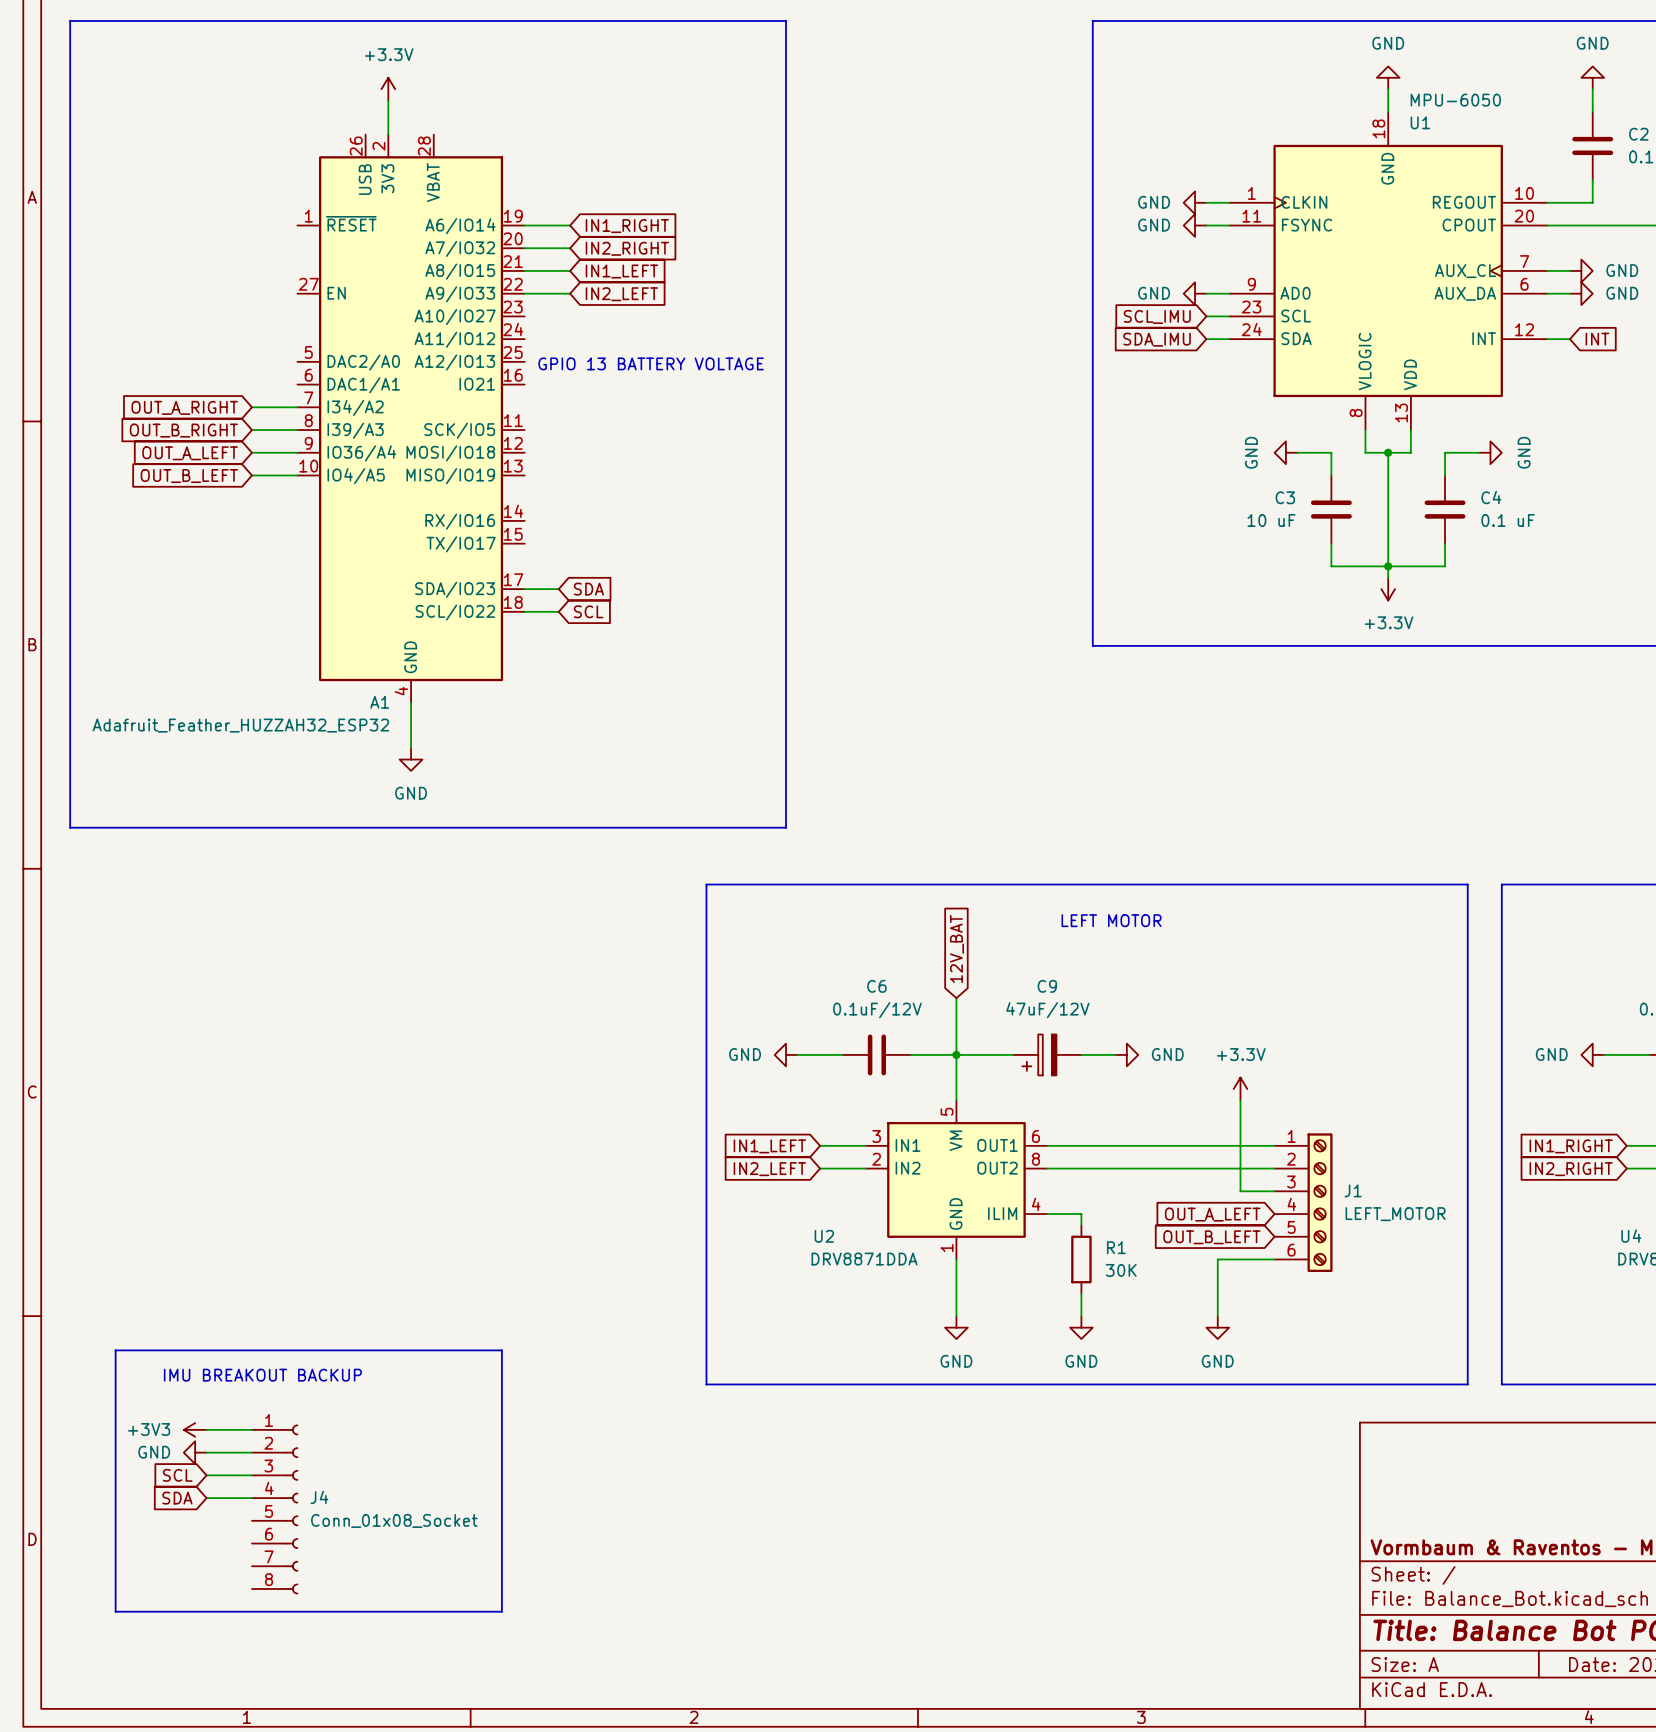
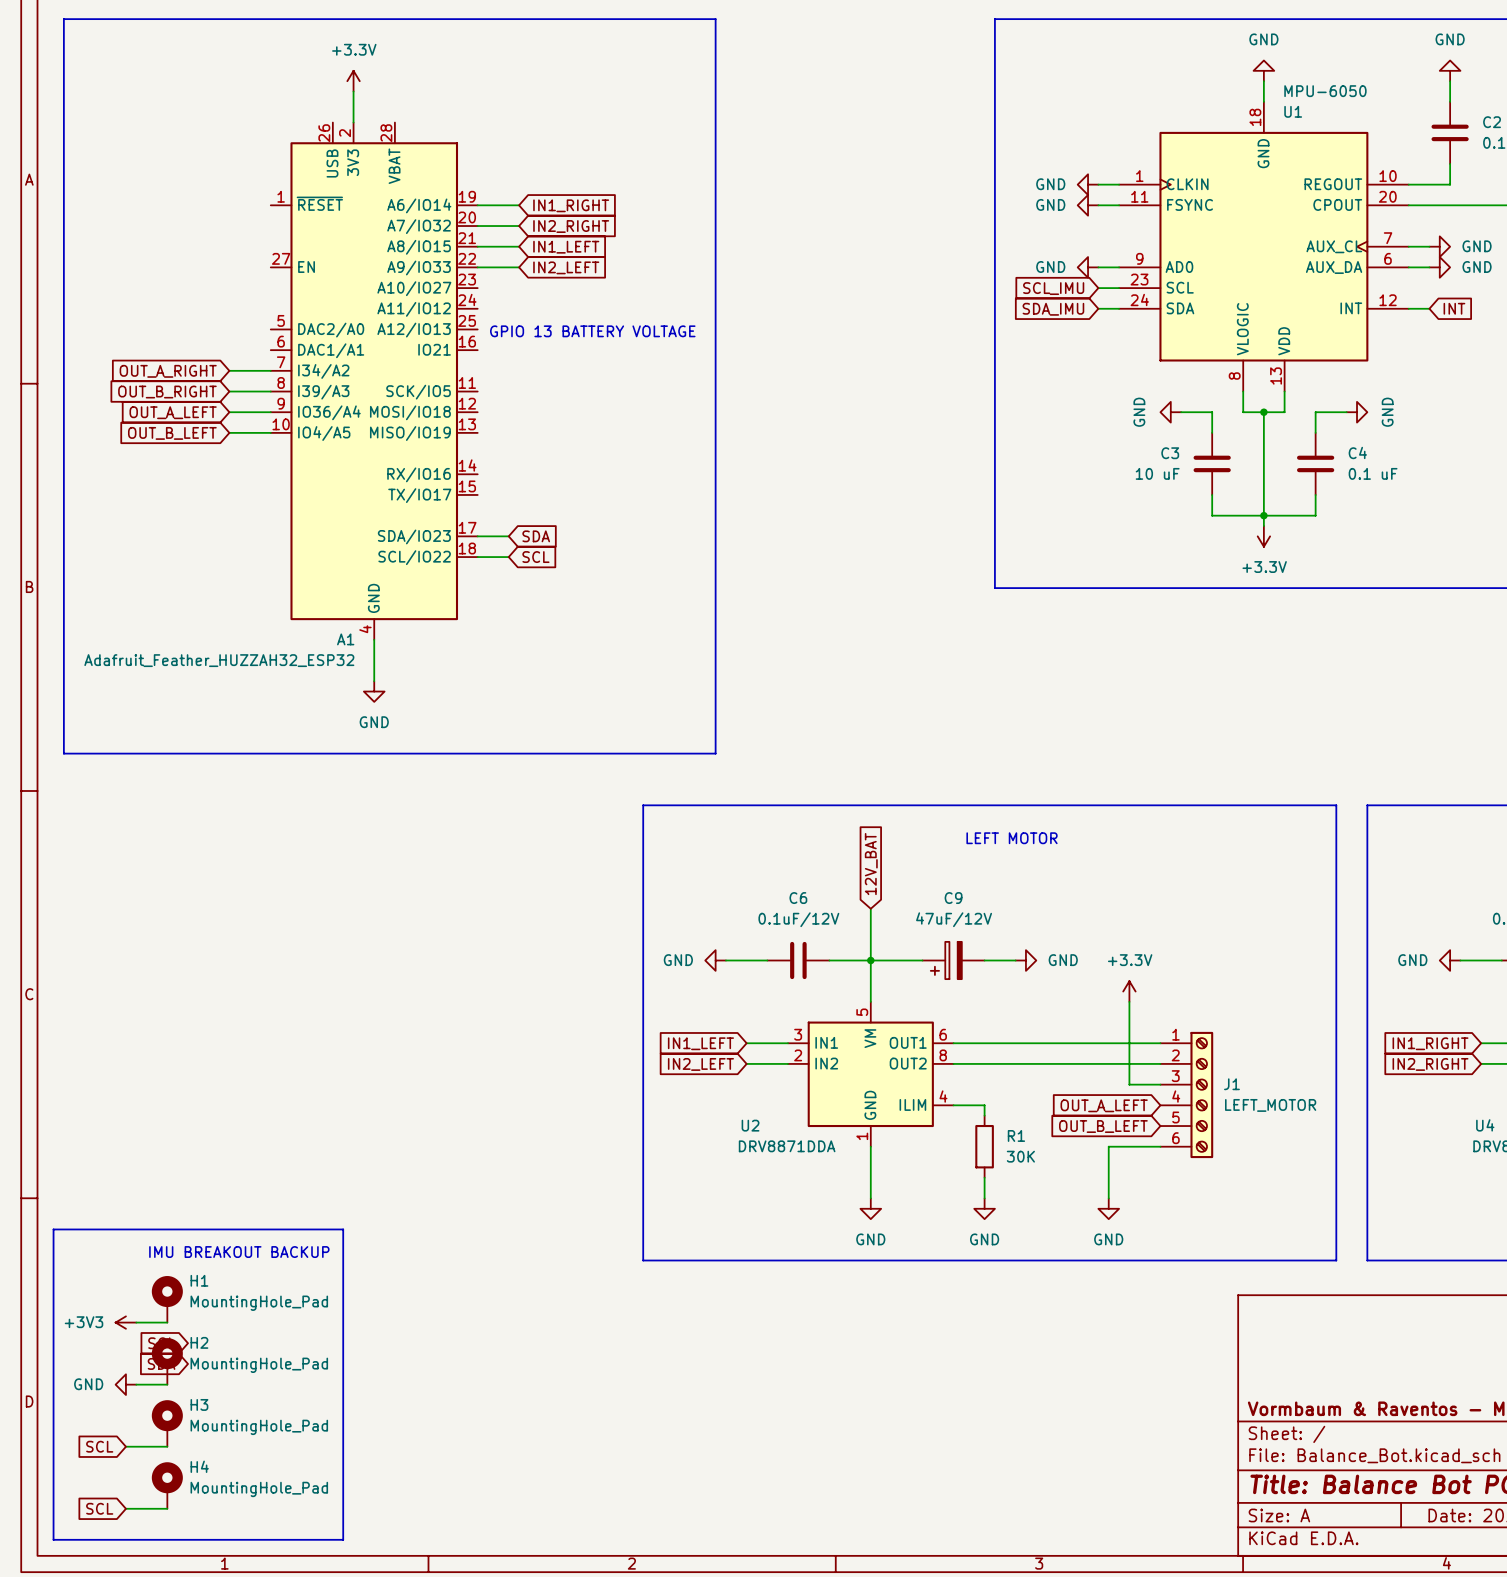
line: (115, 1350) (115, 1611) (501, 1611) (501, 1350) (376, 1350) -> (105, 1229) (53, 1229) (53, 1539) (343, 1539) (343, 1229)
H1: none -> MountingHole_Pad (167, 1299)
power symbol position: +3V3 (195, 1429) -> +3V3 (125, 1322)
wire: (206, 1429) (251, 1429) -> (125, 1446) (167, 1446)
wire: none -> (136, 1322) (167, 1322)
power symbol position: GND (195, 1452) -> GND (125, 1384)
wire: (206, 1452) (251, 1452) -> none
wire: (206, 1475) (251, 1475) -> none
H2: none -> MountingHole_Pad (167, 1361)
wire: (206, 1498) (251, 1498) -> (125, 1508) (167, 1508)
J4: Conn_01x08_Socket (275, 1509) -> none
wire: none -> (136, 1384) (167, 1384)
H3: none -> MountingHole_Pad (167, 1423)
global label: none -> SCL (99, 1446)
H4: none -> MountingHole_Pad (167, 1485)
global label: none -> SCL (99, 1508)

